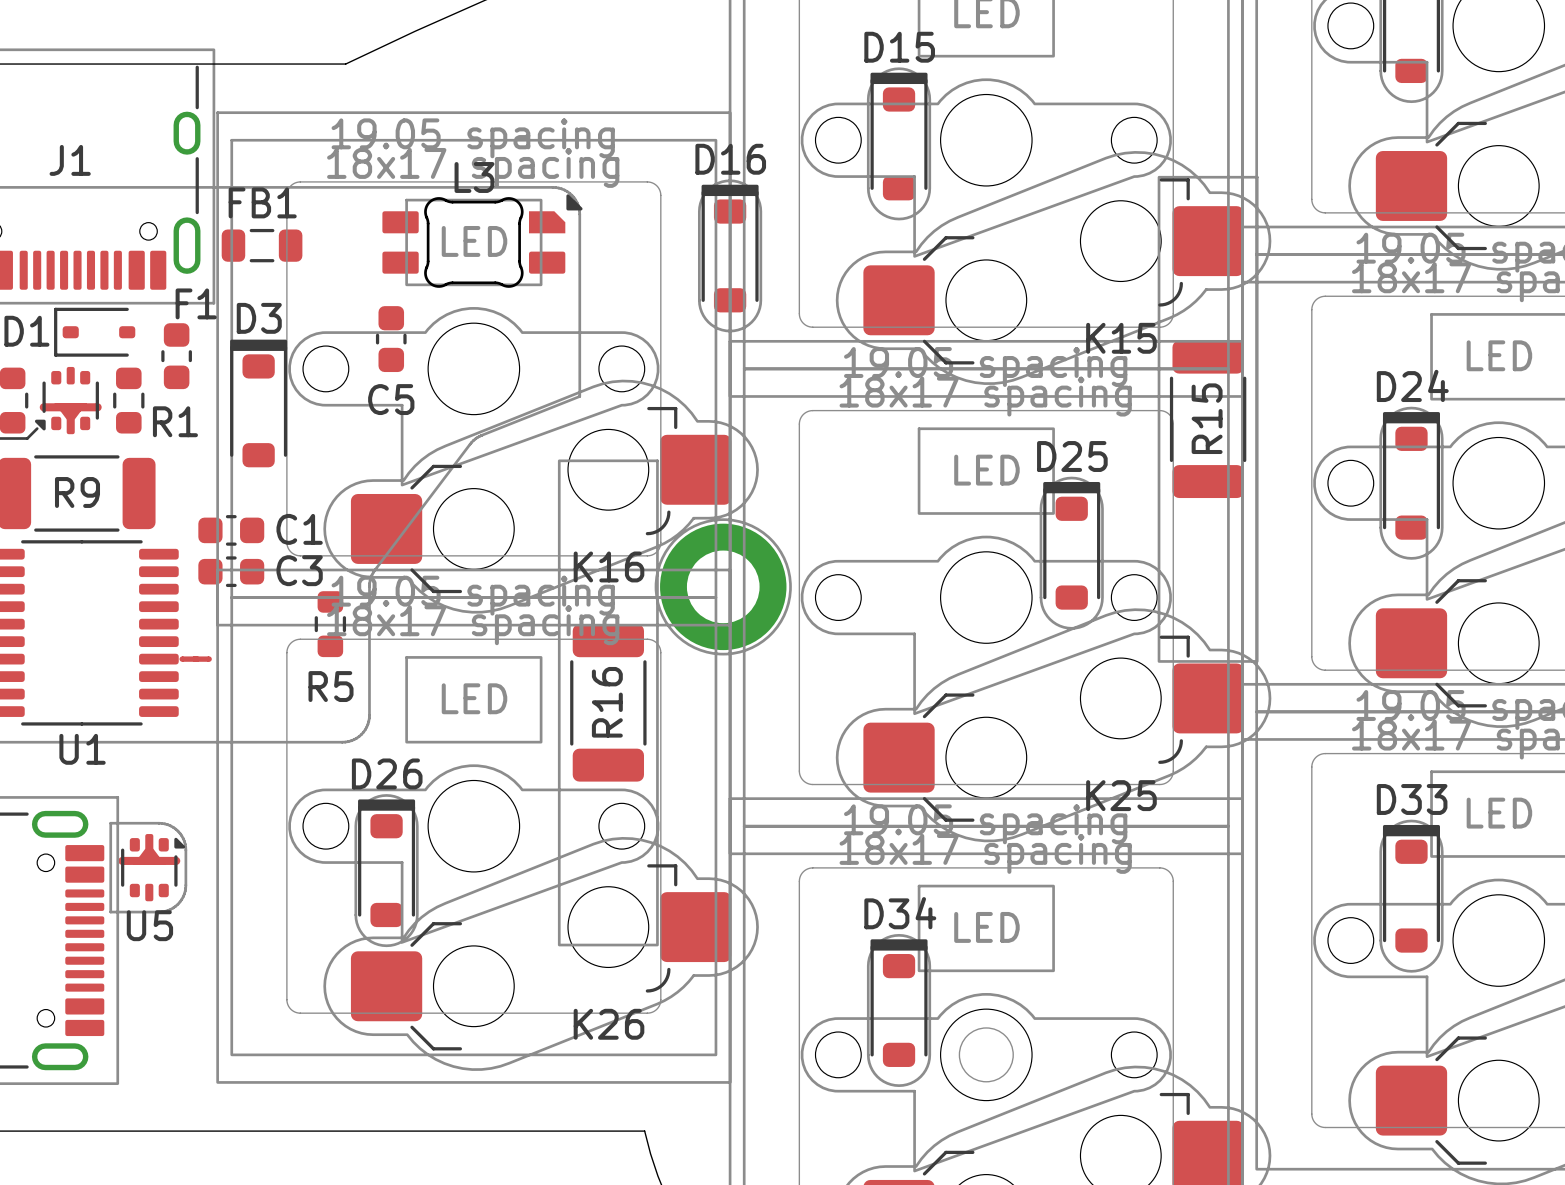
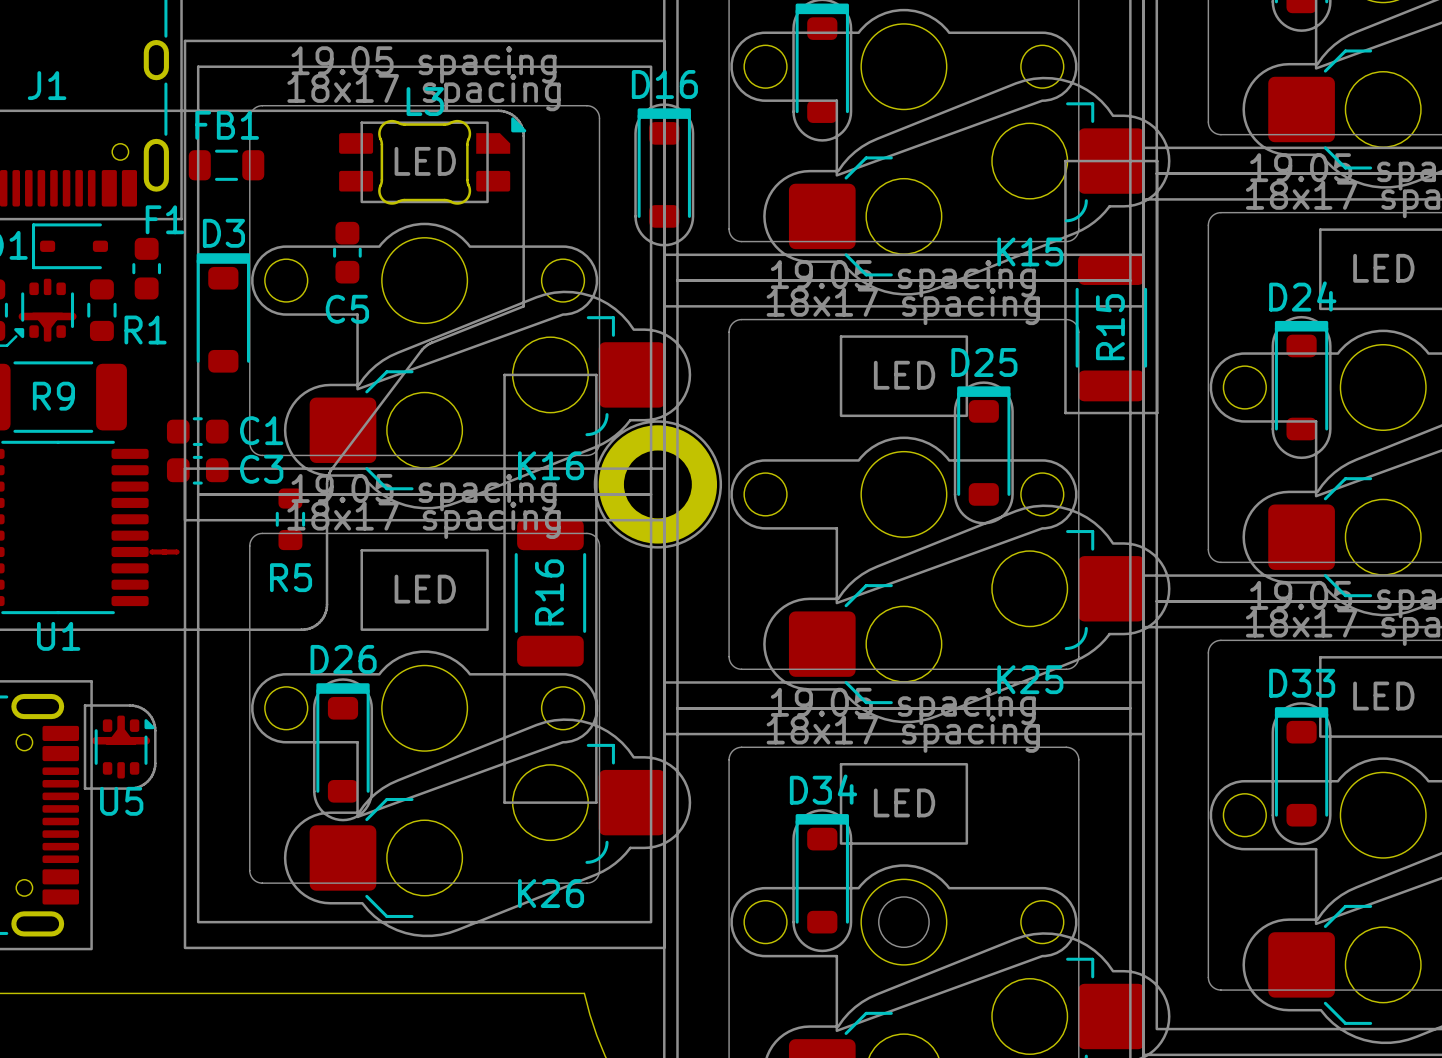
R15 footprint: [1157, 175, 1259, 663] -> [1075, 254, 1148, 402]
line: none -> (1065, 161) (1157, 161) (1157, 413) (1065, 413) (1065, 161)
R16 footprint: [557, 459, 659, 947] -> [514, 519, 587, 667]
line: none -> (504, 374) (596, 374) (596, 802) (504, 802) (504, 374)

